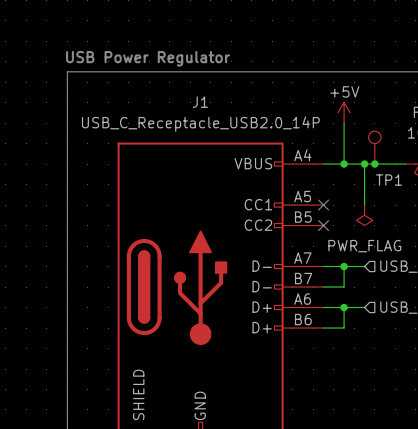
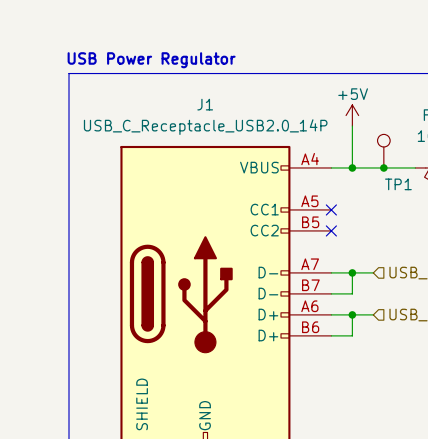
wire: (364, 164) (364, 205) -> none
junction: (364, 164) -> none
power symbol: PWR_FLAG (364, 215) -> none

